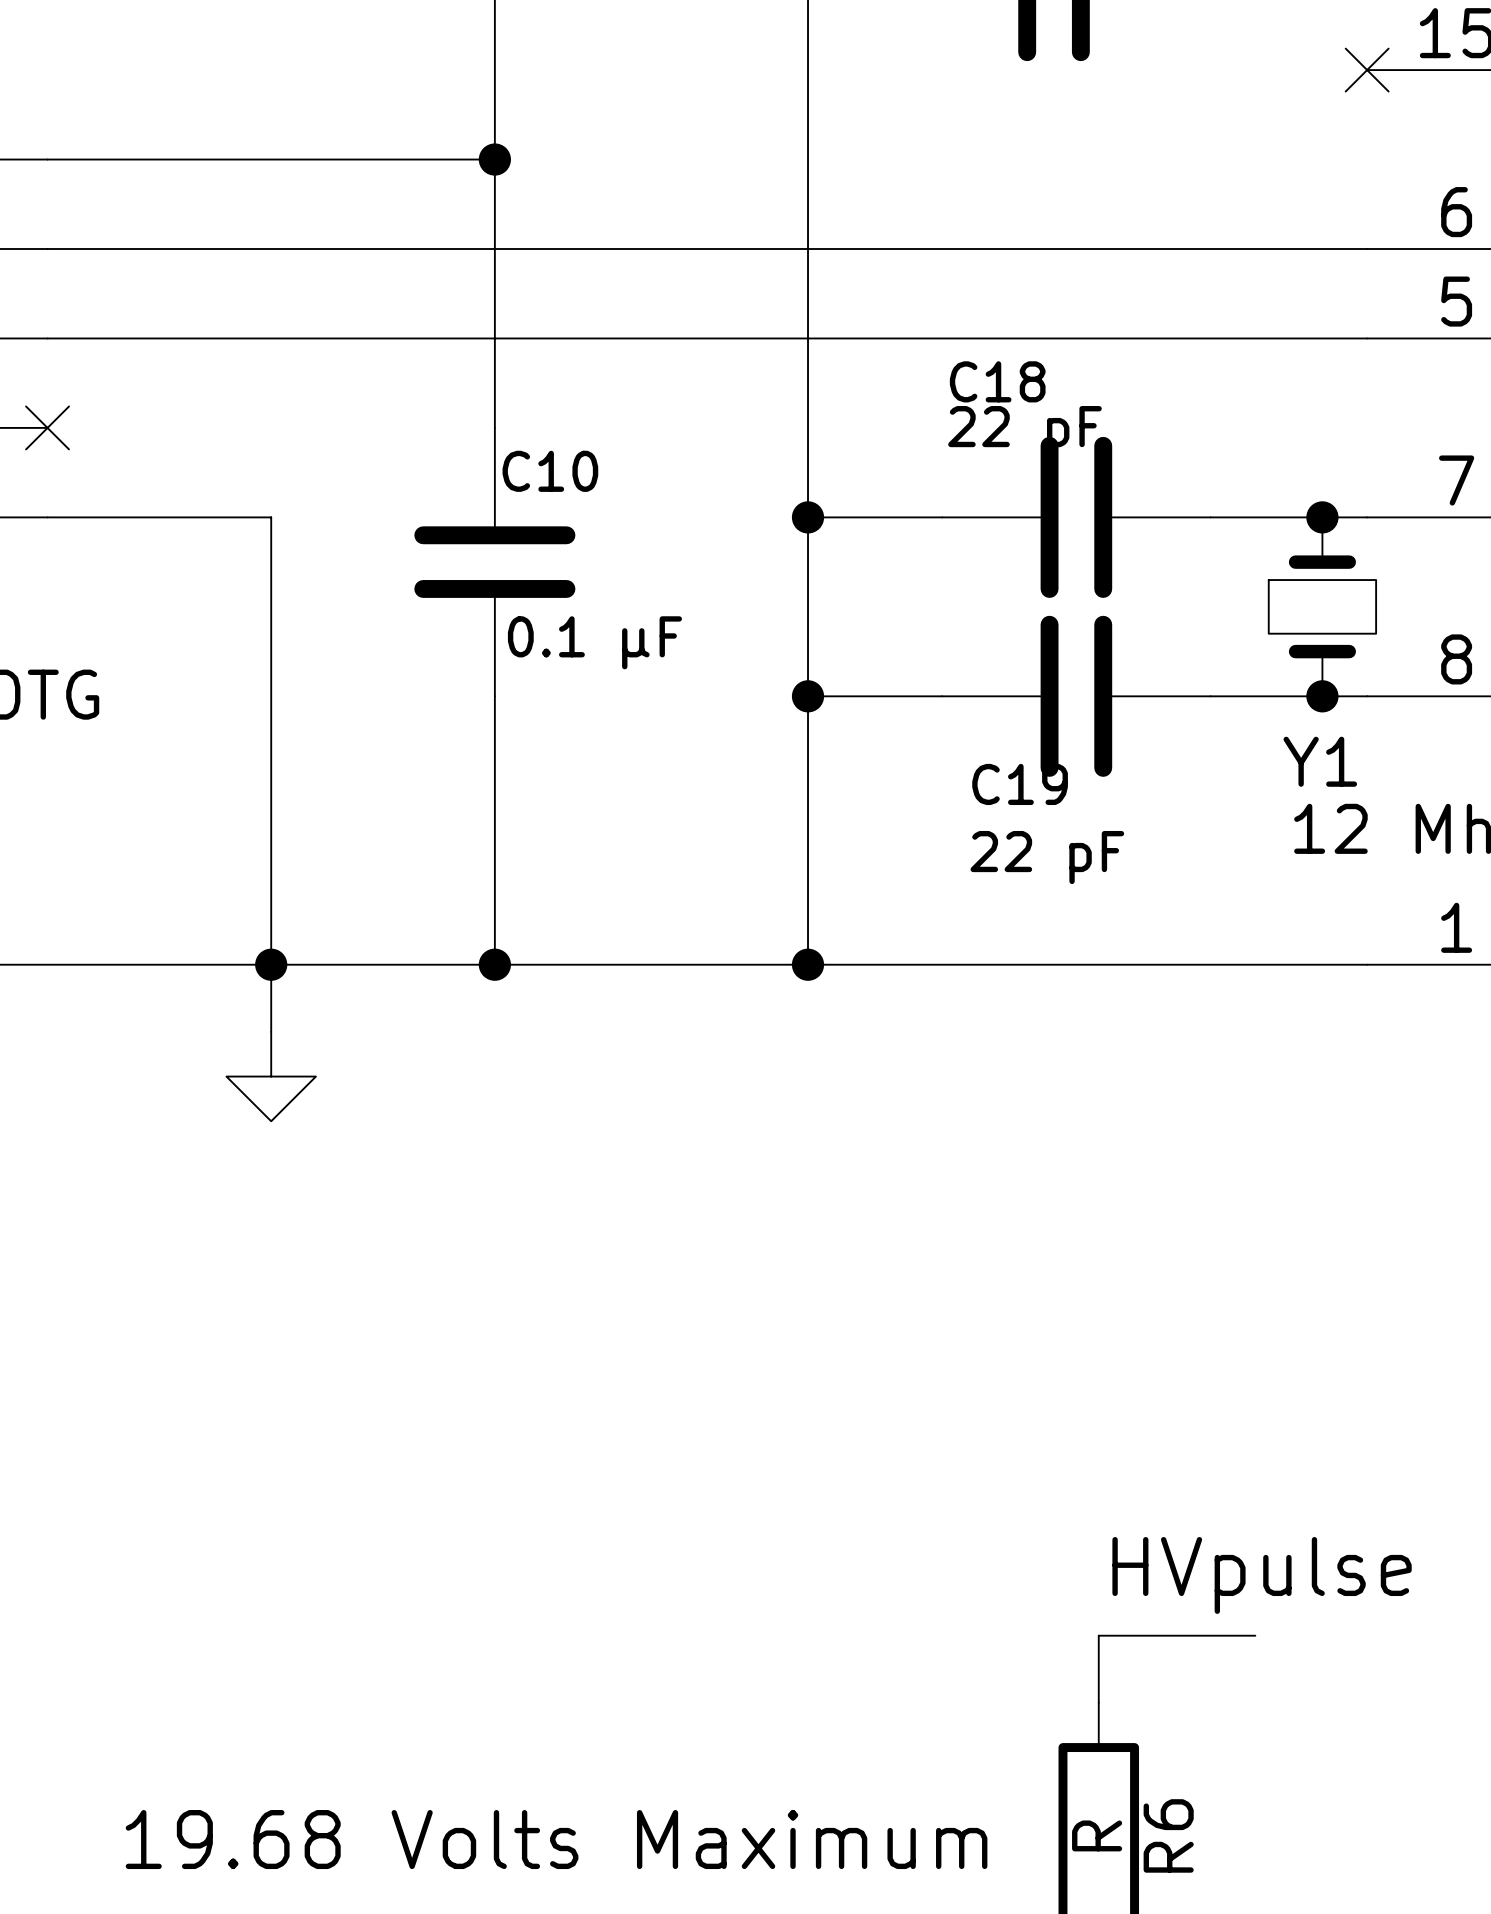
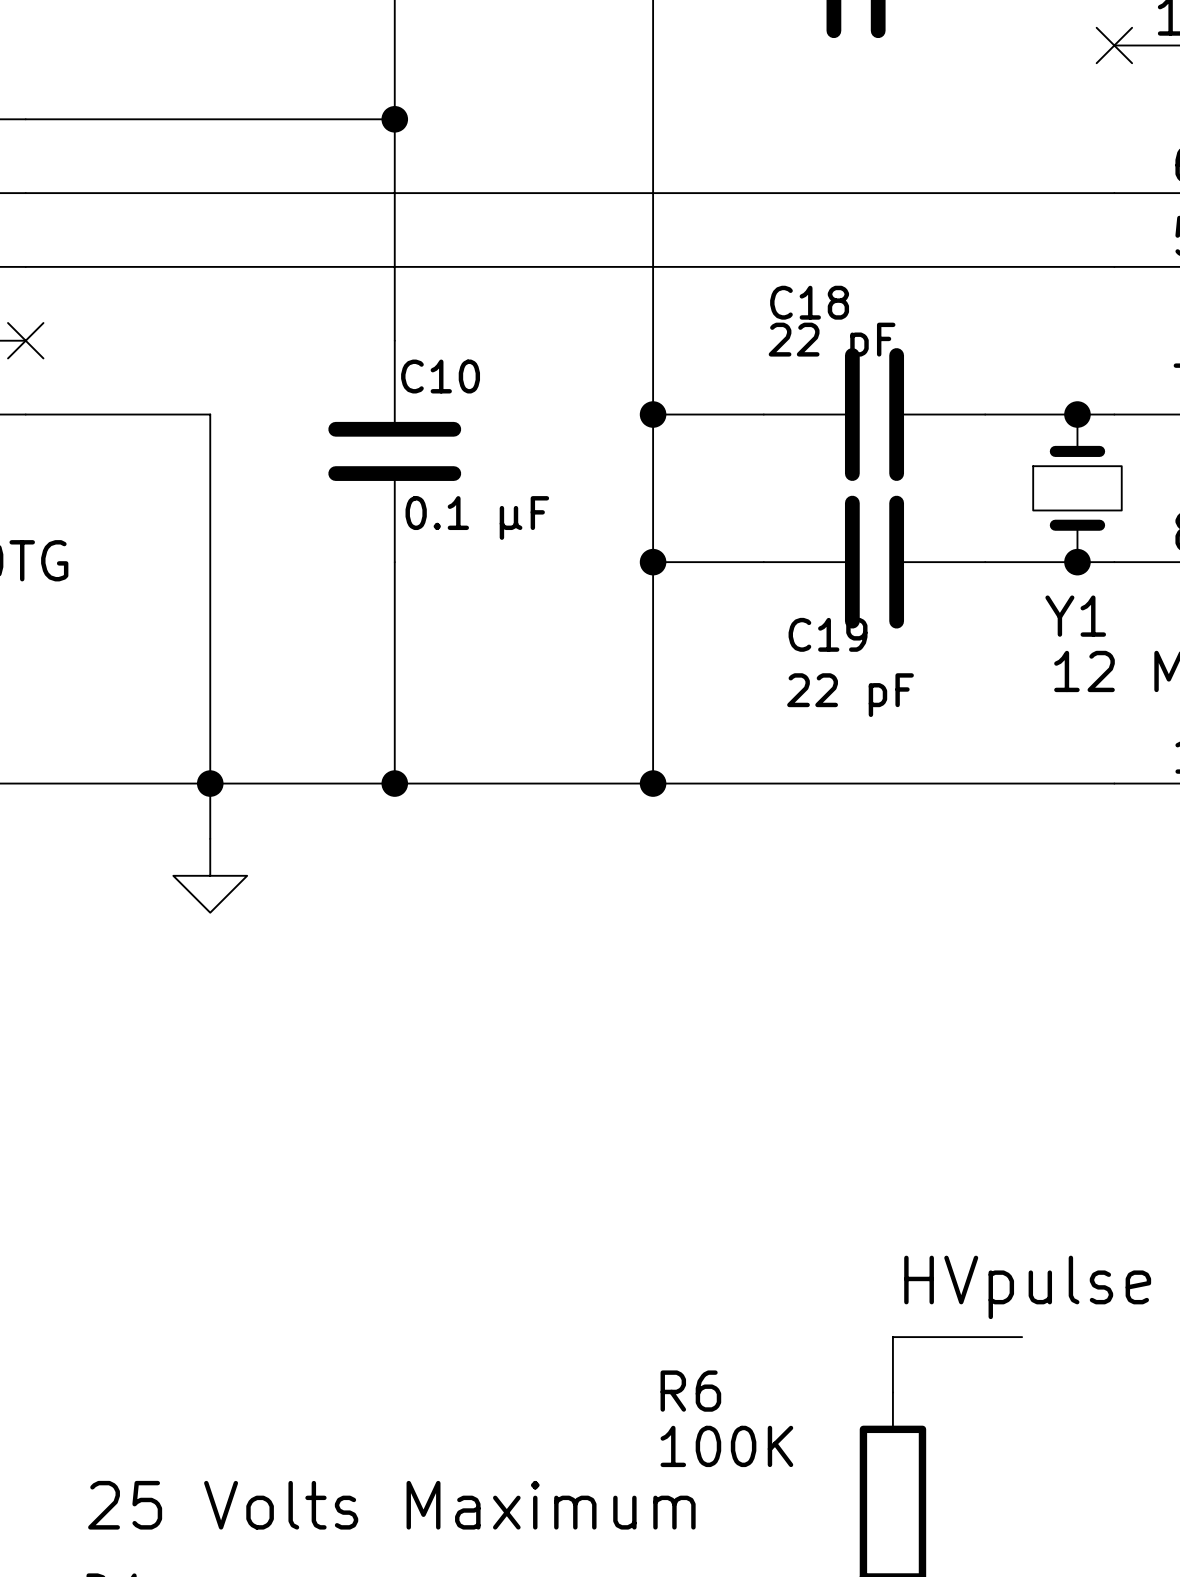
R6 value: R (1097, 1835) -> 100K (726, 1446)
R6 name rotation: 0° (1168, 1835) -> 90° clockwise (690, 1391)
R6 name position: R6 (1168, 1835) -> R6 (690, 1391)
text: 19.68 Volts Maximum (556, 1839) -> 25 Volts Maximum (391, 1505)

